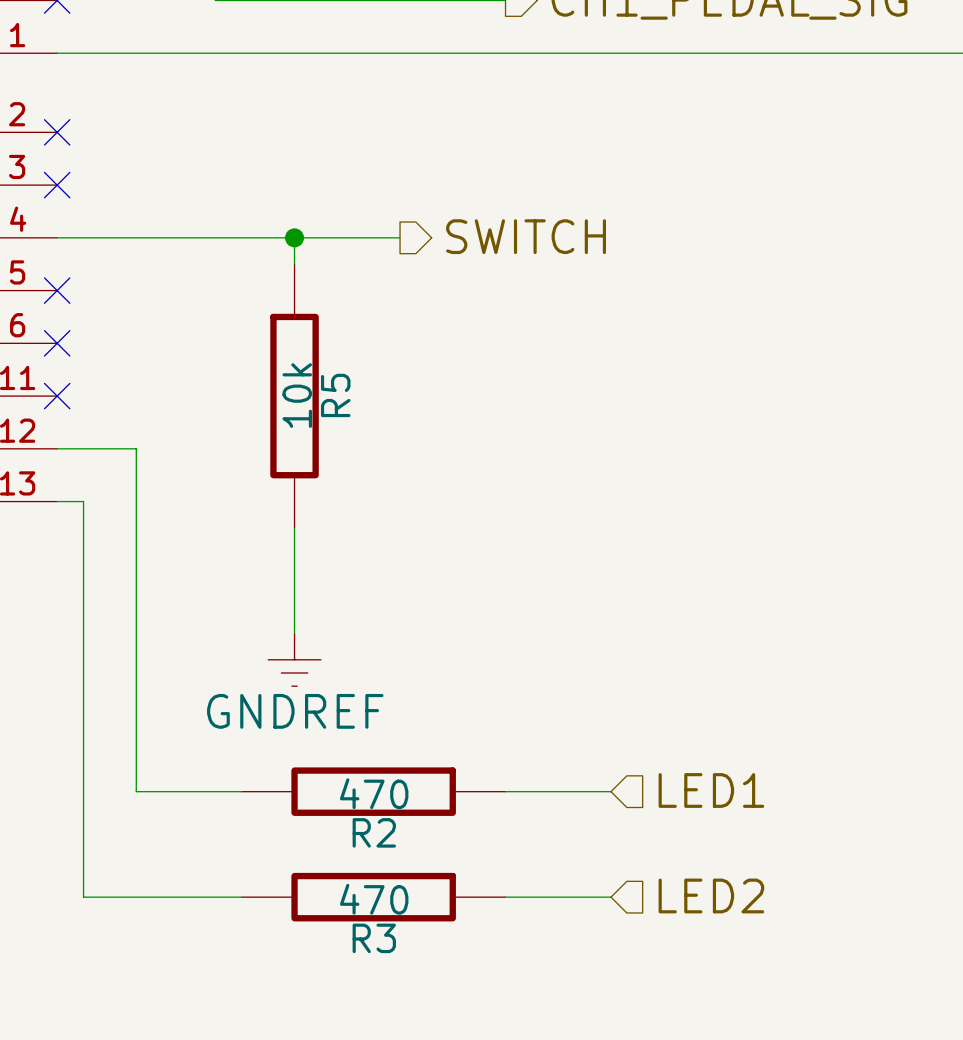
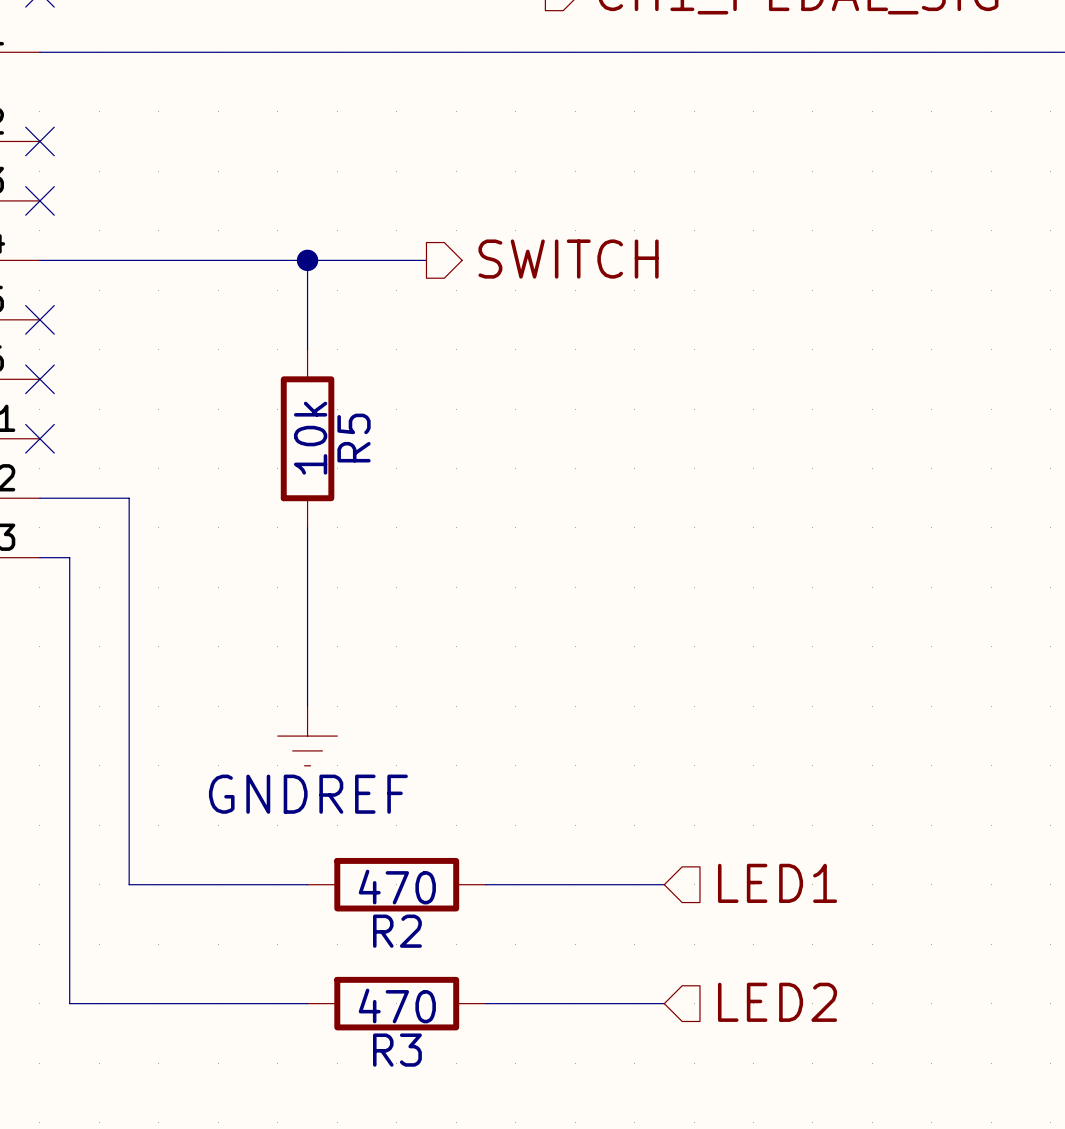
R5 symbol: [270, 264, 319, 528] -> [280, 349, 335, 528]
R2 symbol: [241, 767, 506, 816] -> [307, 857, 486, 912]
R3 symbol: [241, 872, 506, 922] -> [307, 976, 486, 1031]

